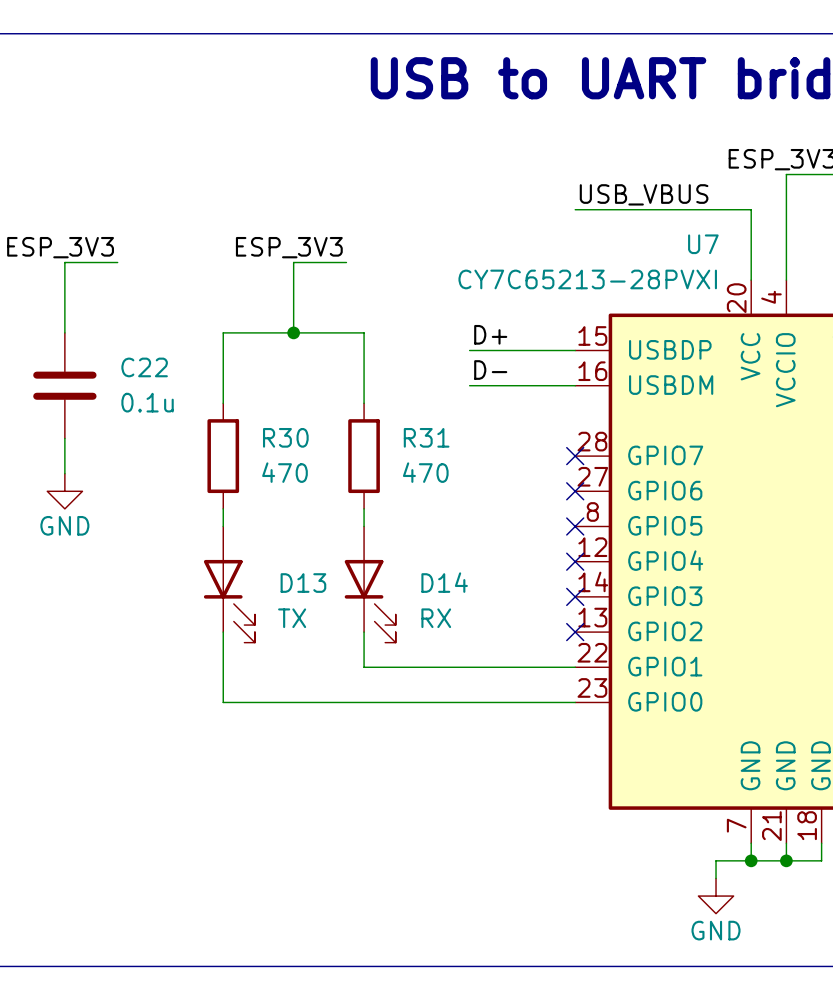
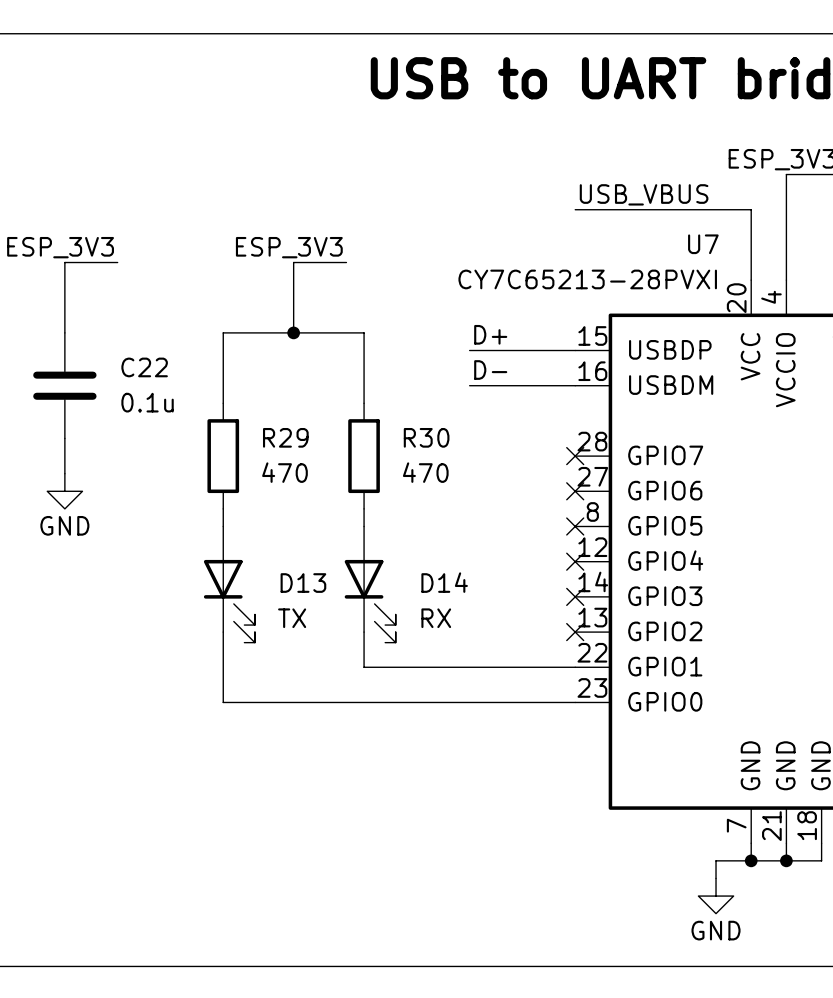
R30 name: R30 (285, 437) -> R29 (285, 437)
R31 name: R31 (426, 437) -> R30 (426, 437)

